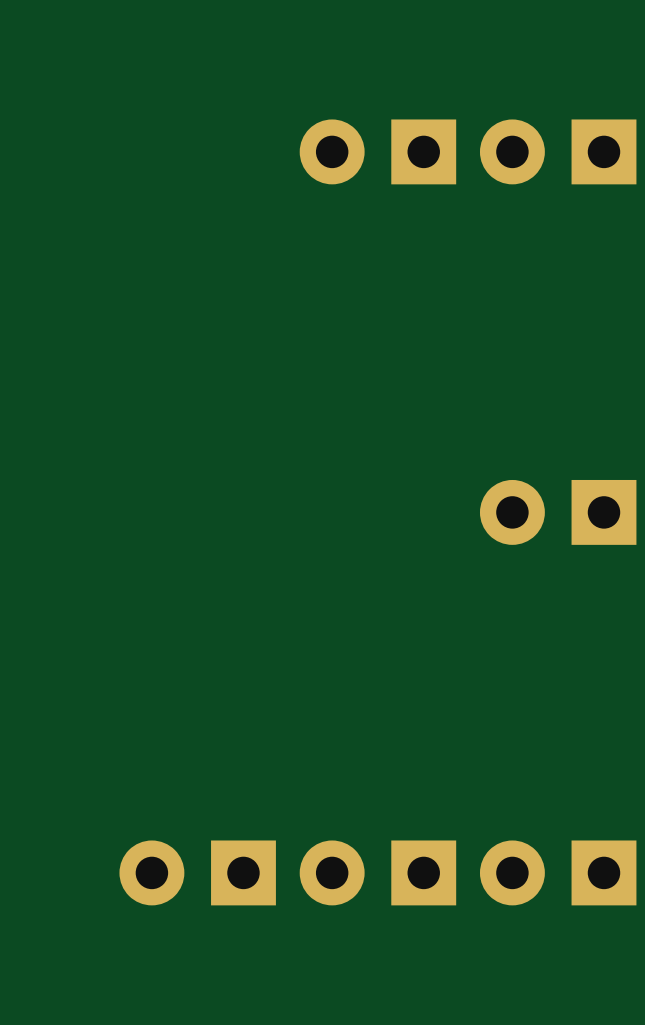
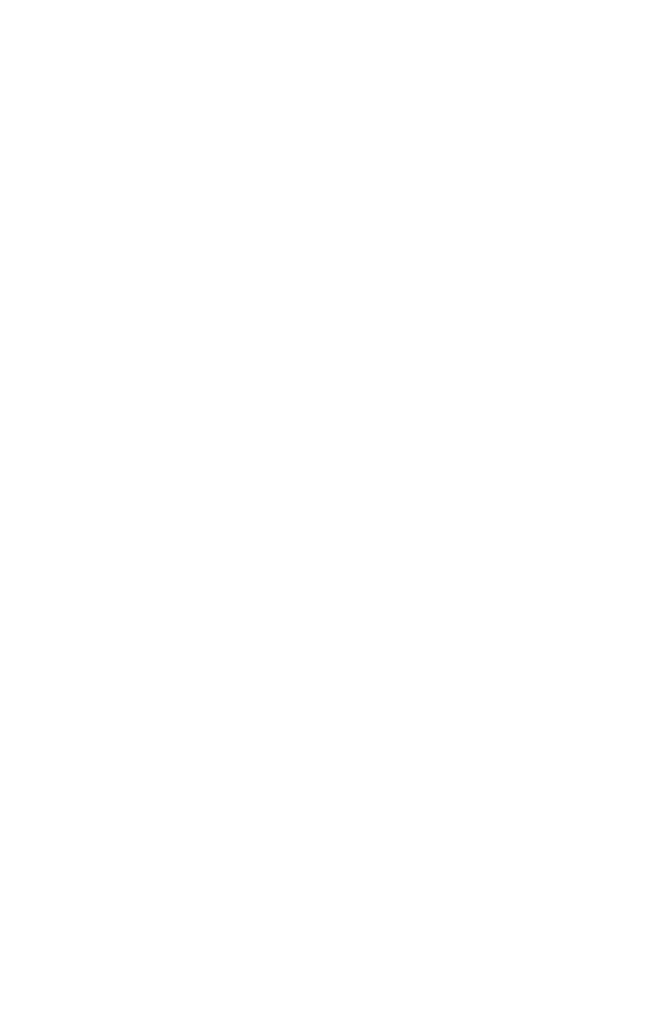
part: (377, 151) -> none
part: (558, 151) -> none
part: (558, 512) -> none
part: (197, 872) -> none
part: (377, 872) -> none
part: (558, 872) -> none

